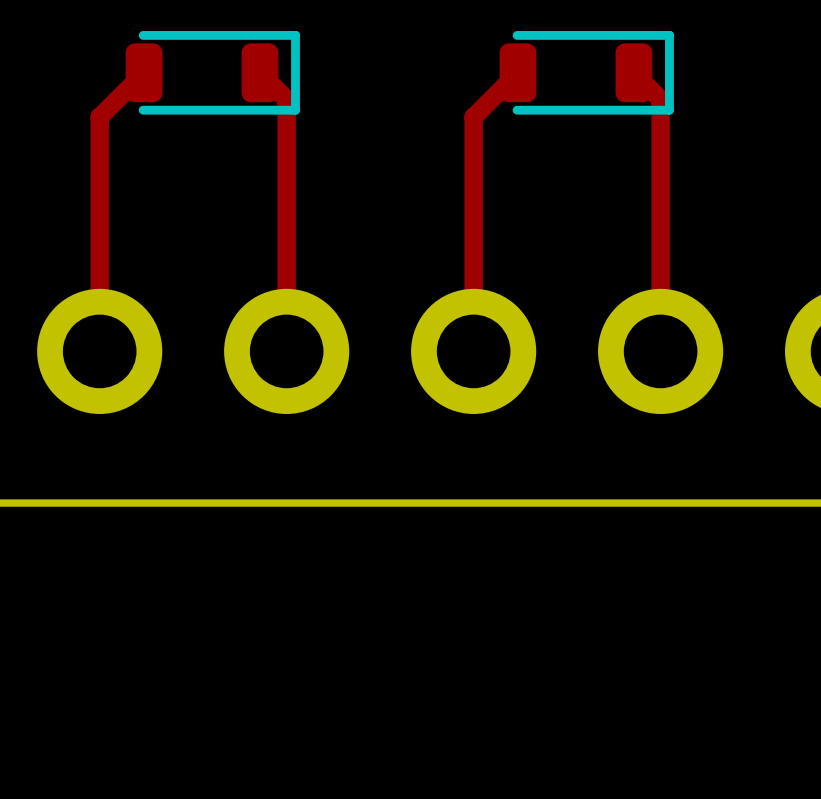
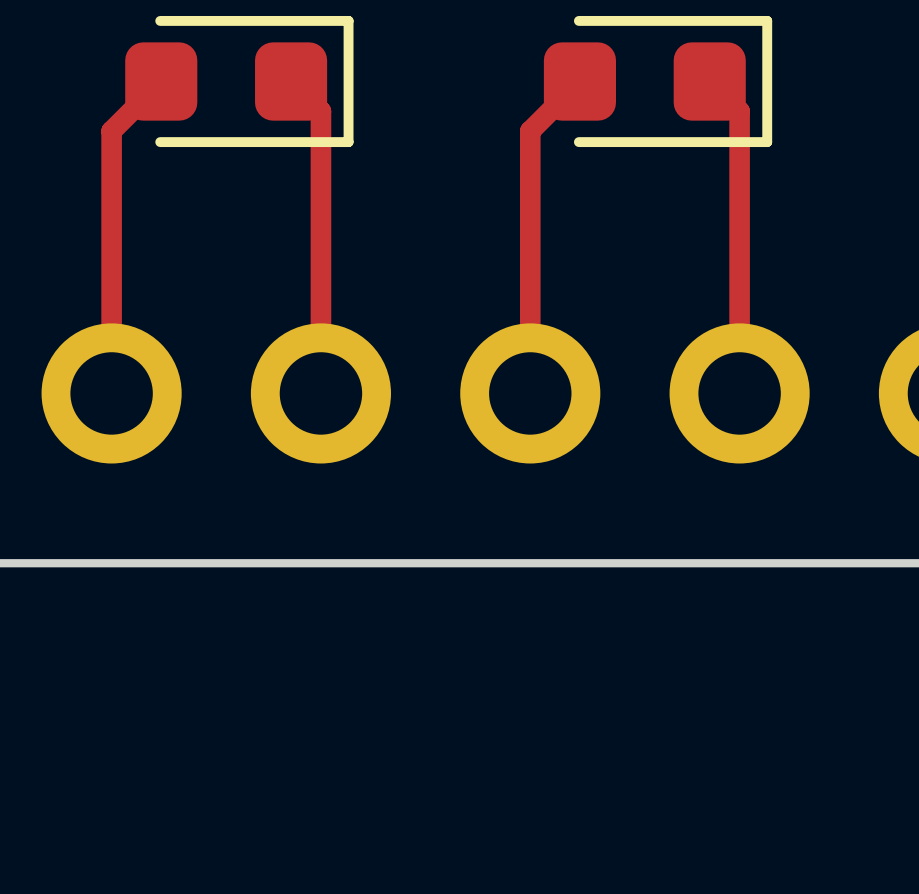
part footprint: [125, 30, 300, 115] -> [125, 15, 354, 148]
part footprint: [499, 30, 674, 115] -> [543, 15, 773, 148]

